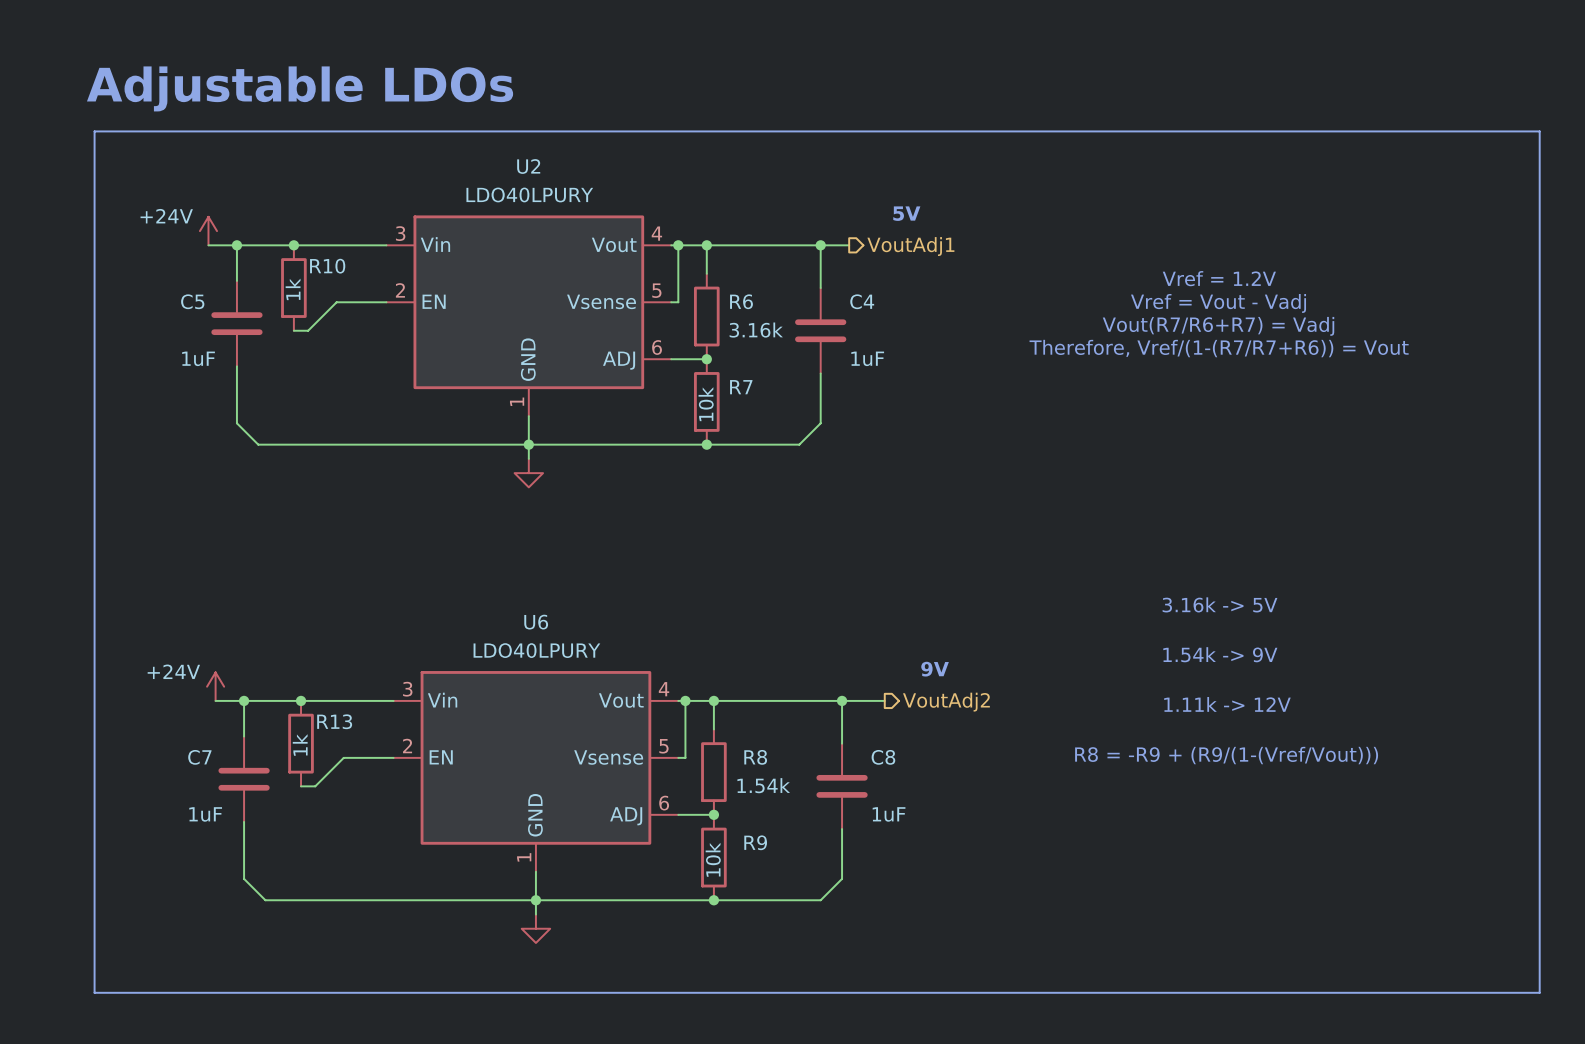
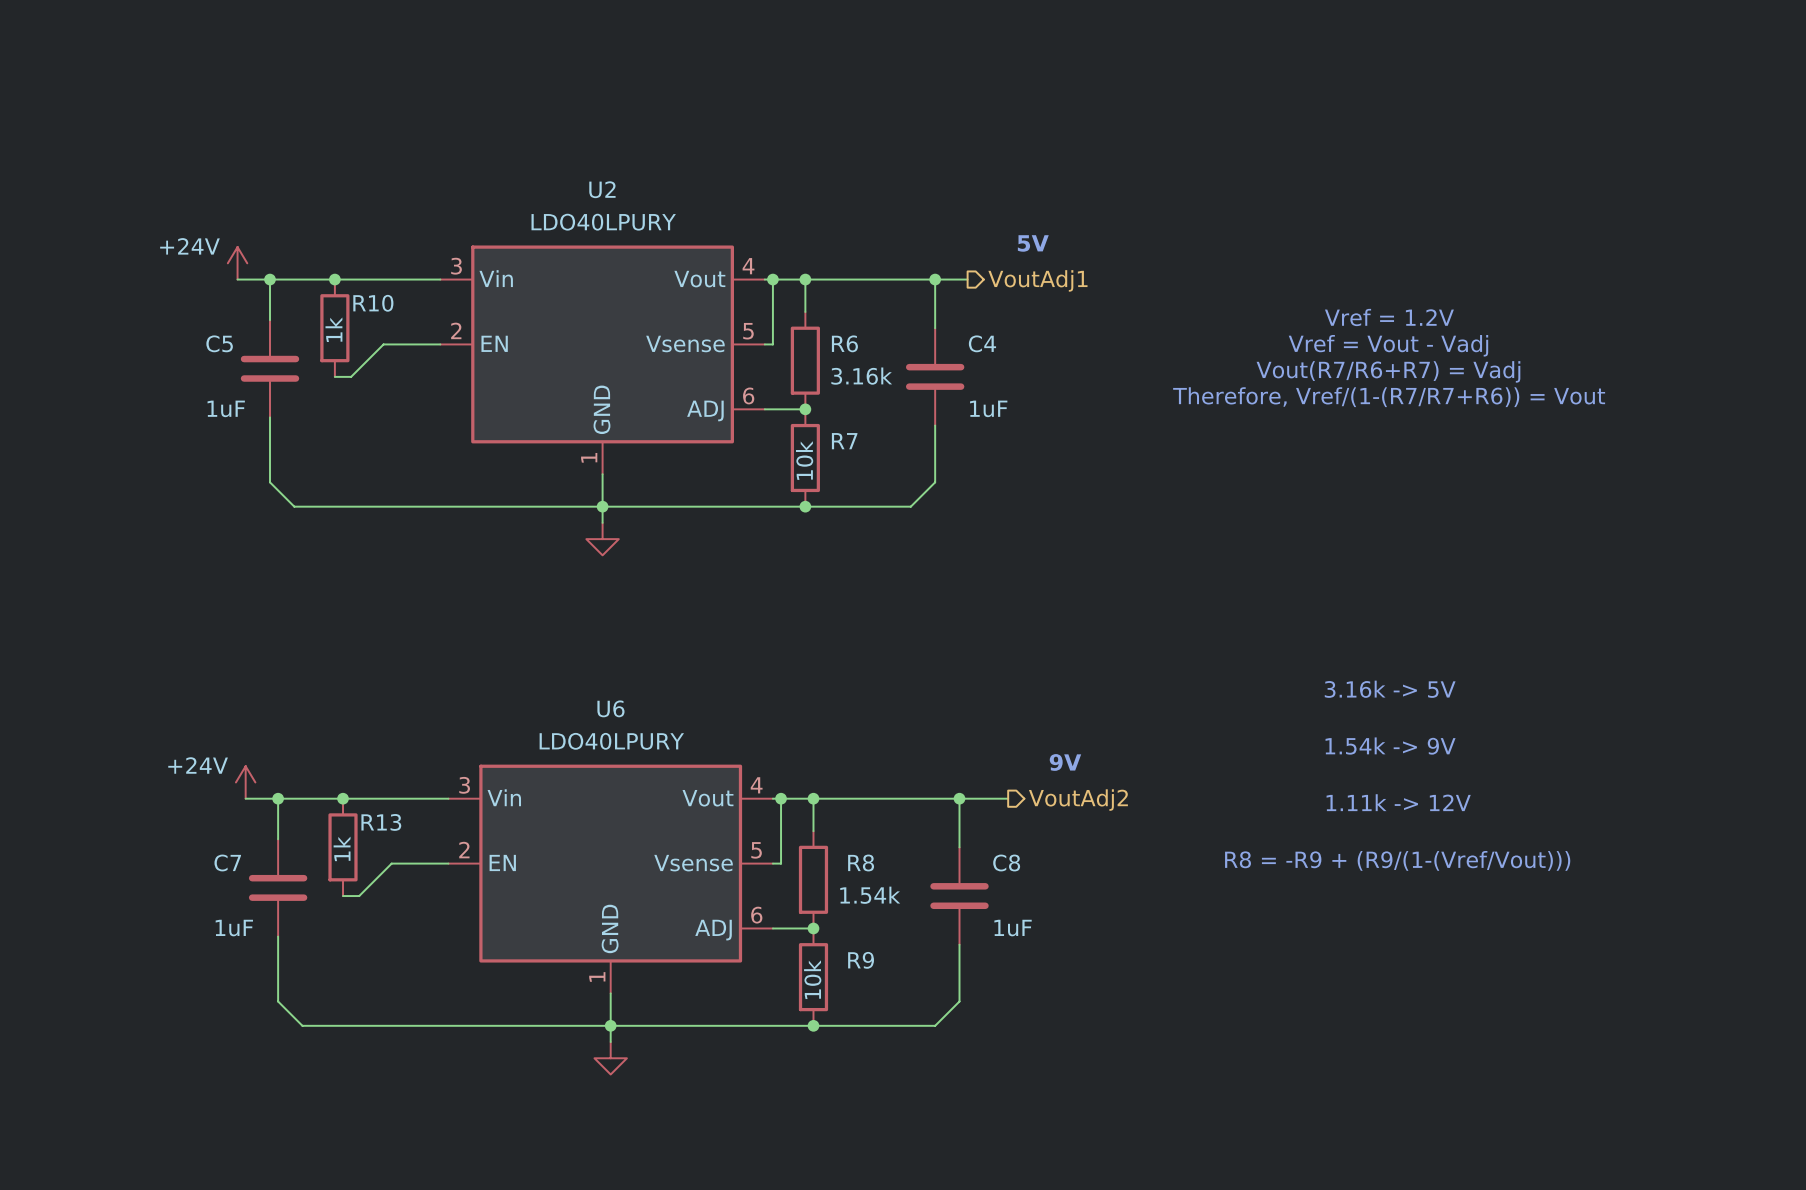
text: Adjustable LDOs (300, 88) -> none
line: (94, 131) (1539, 131) (1539, 992) (94, 992) (94, 131) -> none

